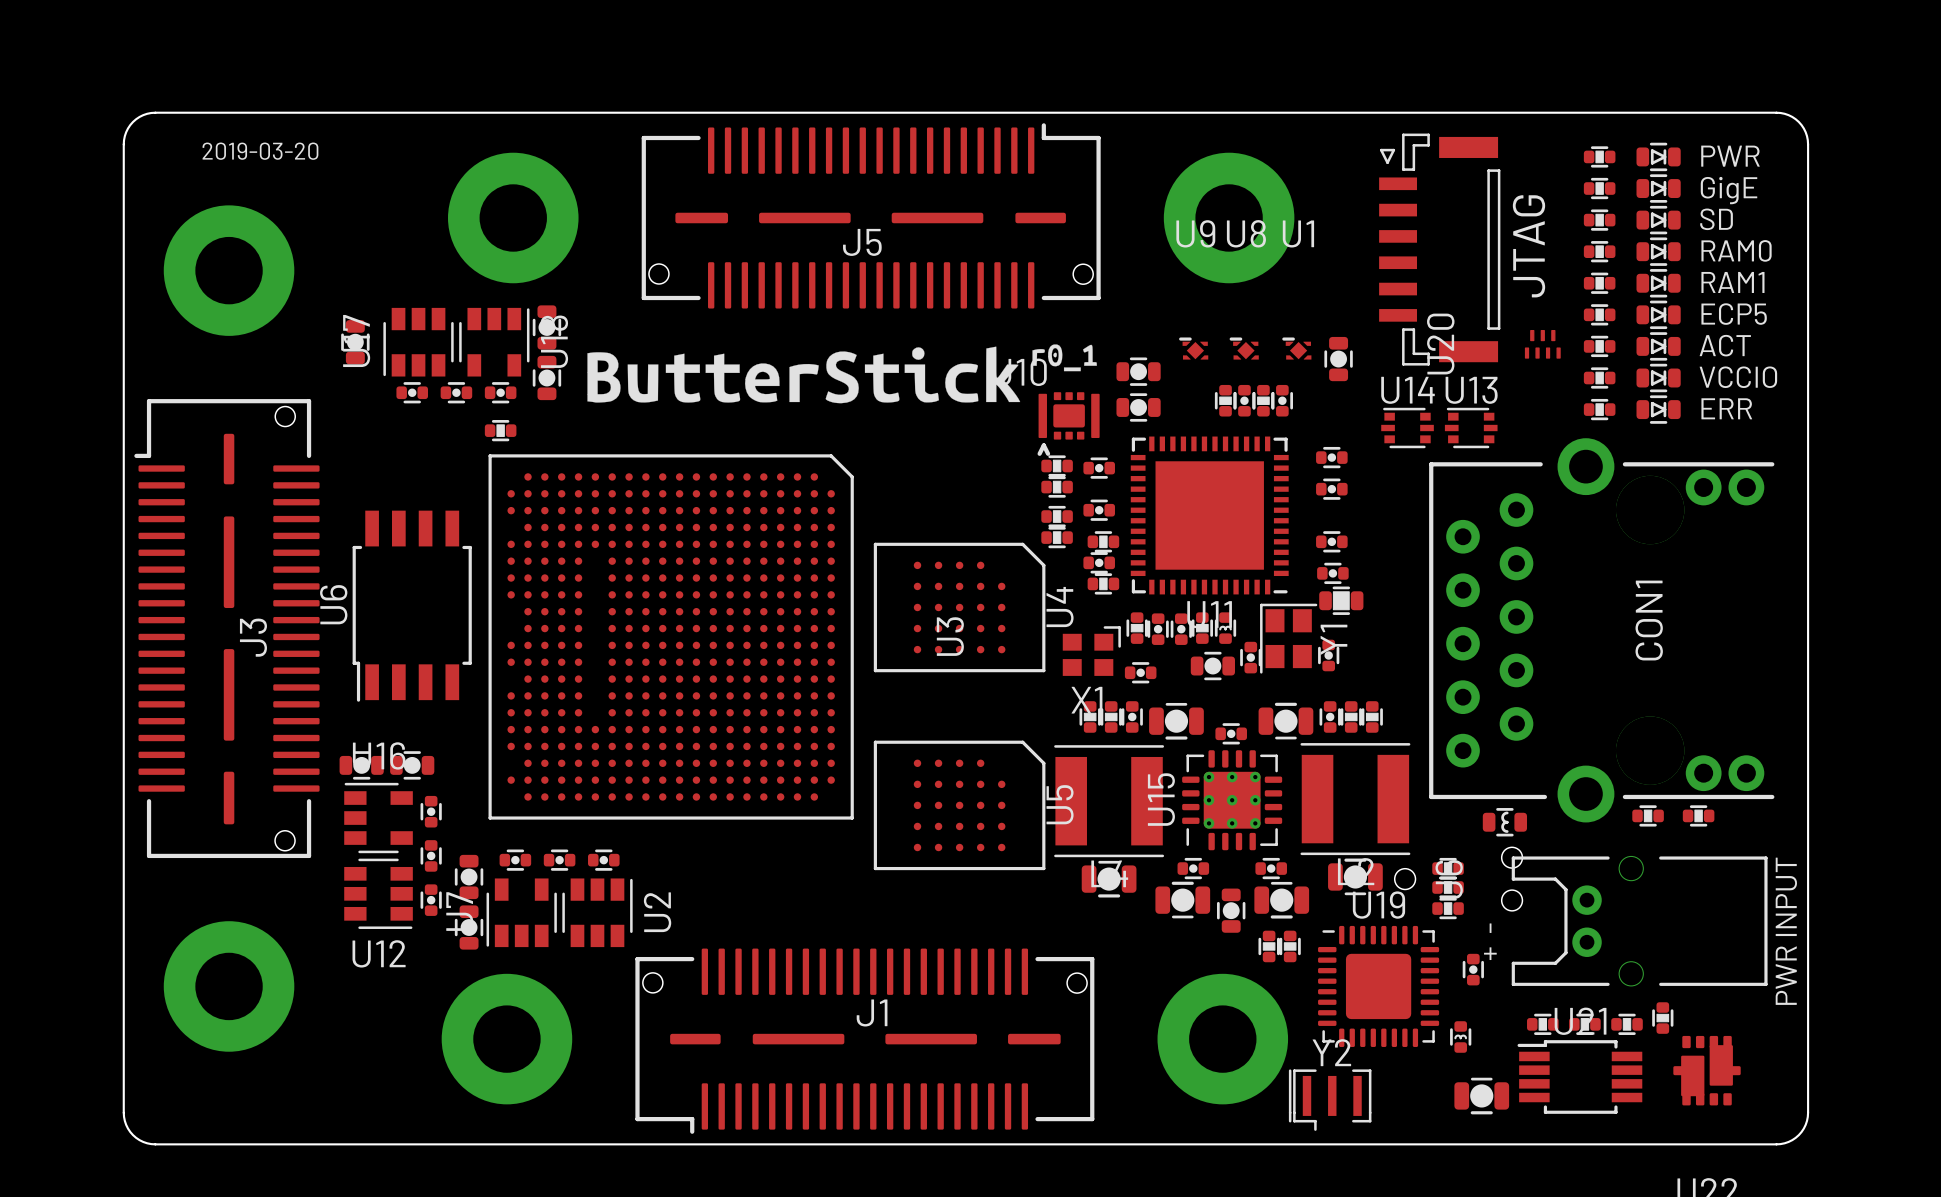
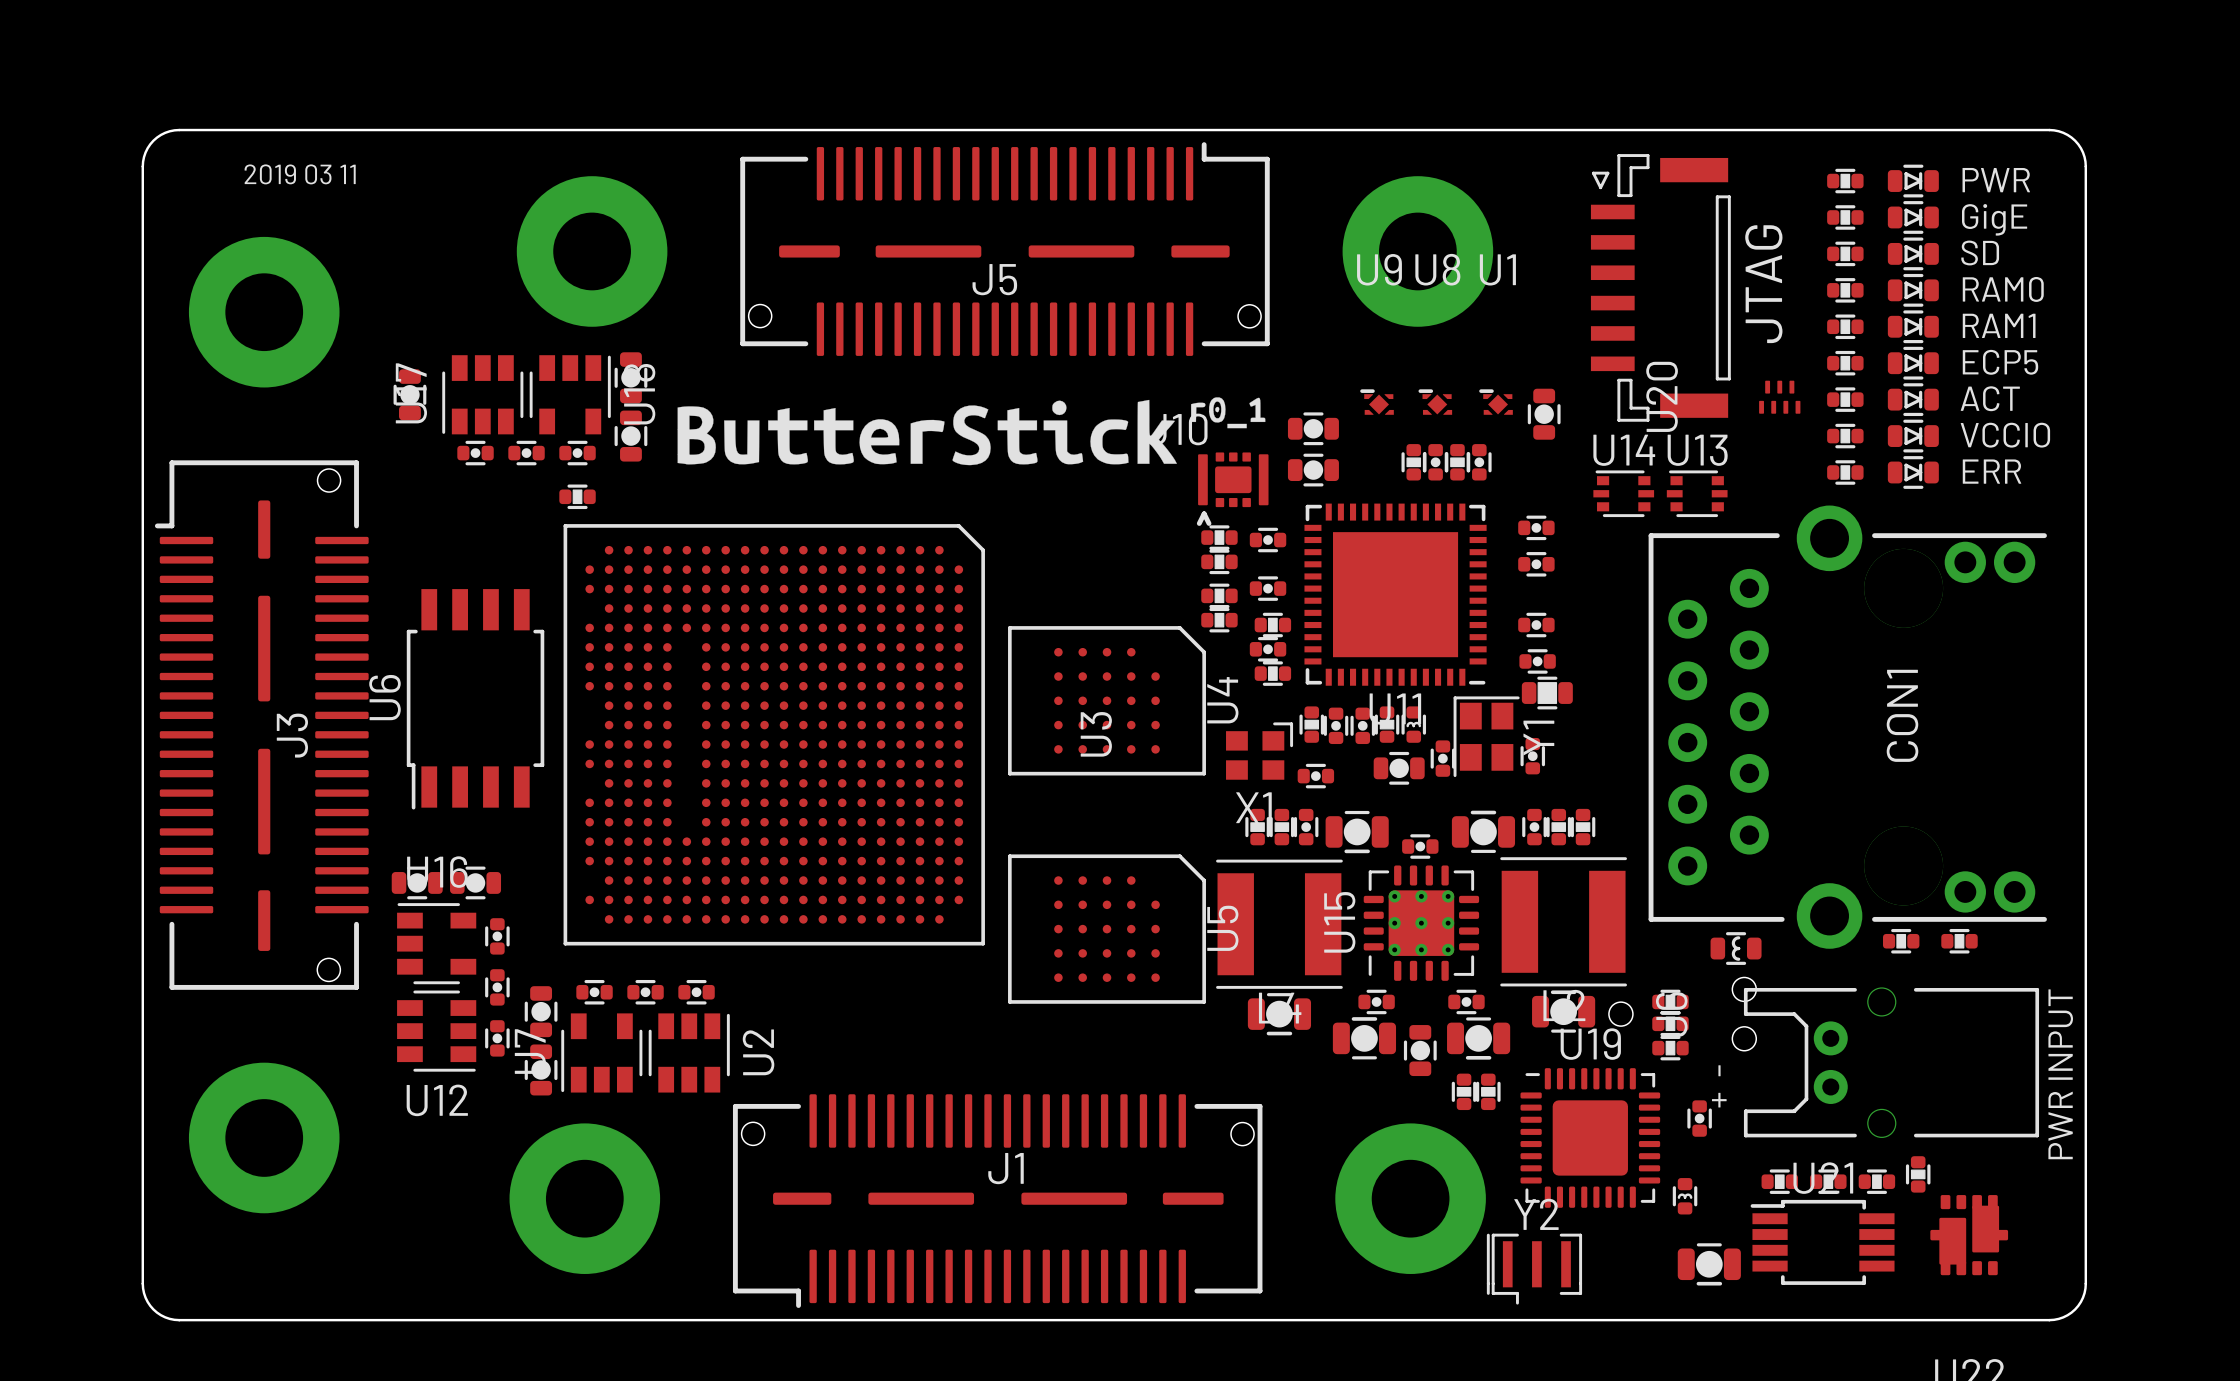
text: 2019-03-20 (260, 151) -> 2019 03 11 (300, 174)

